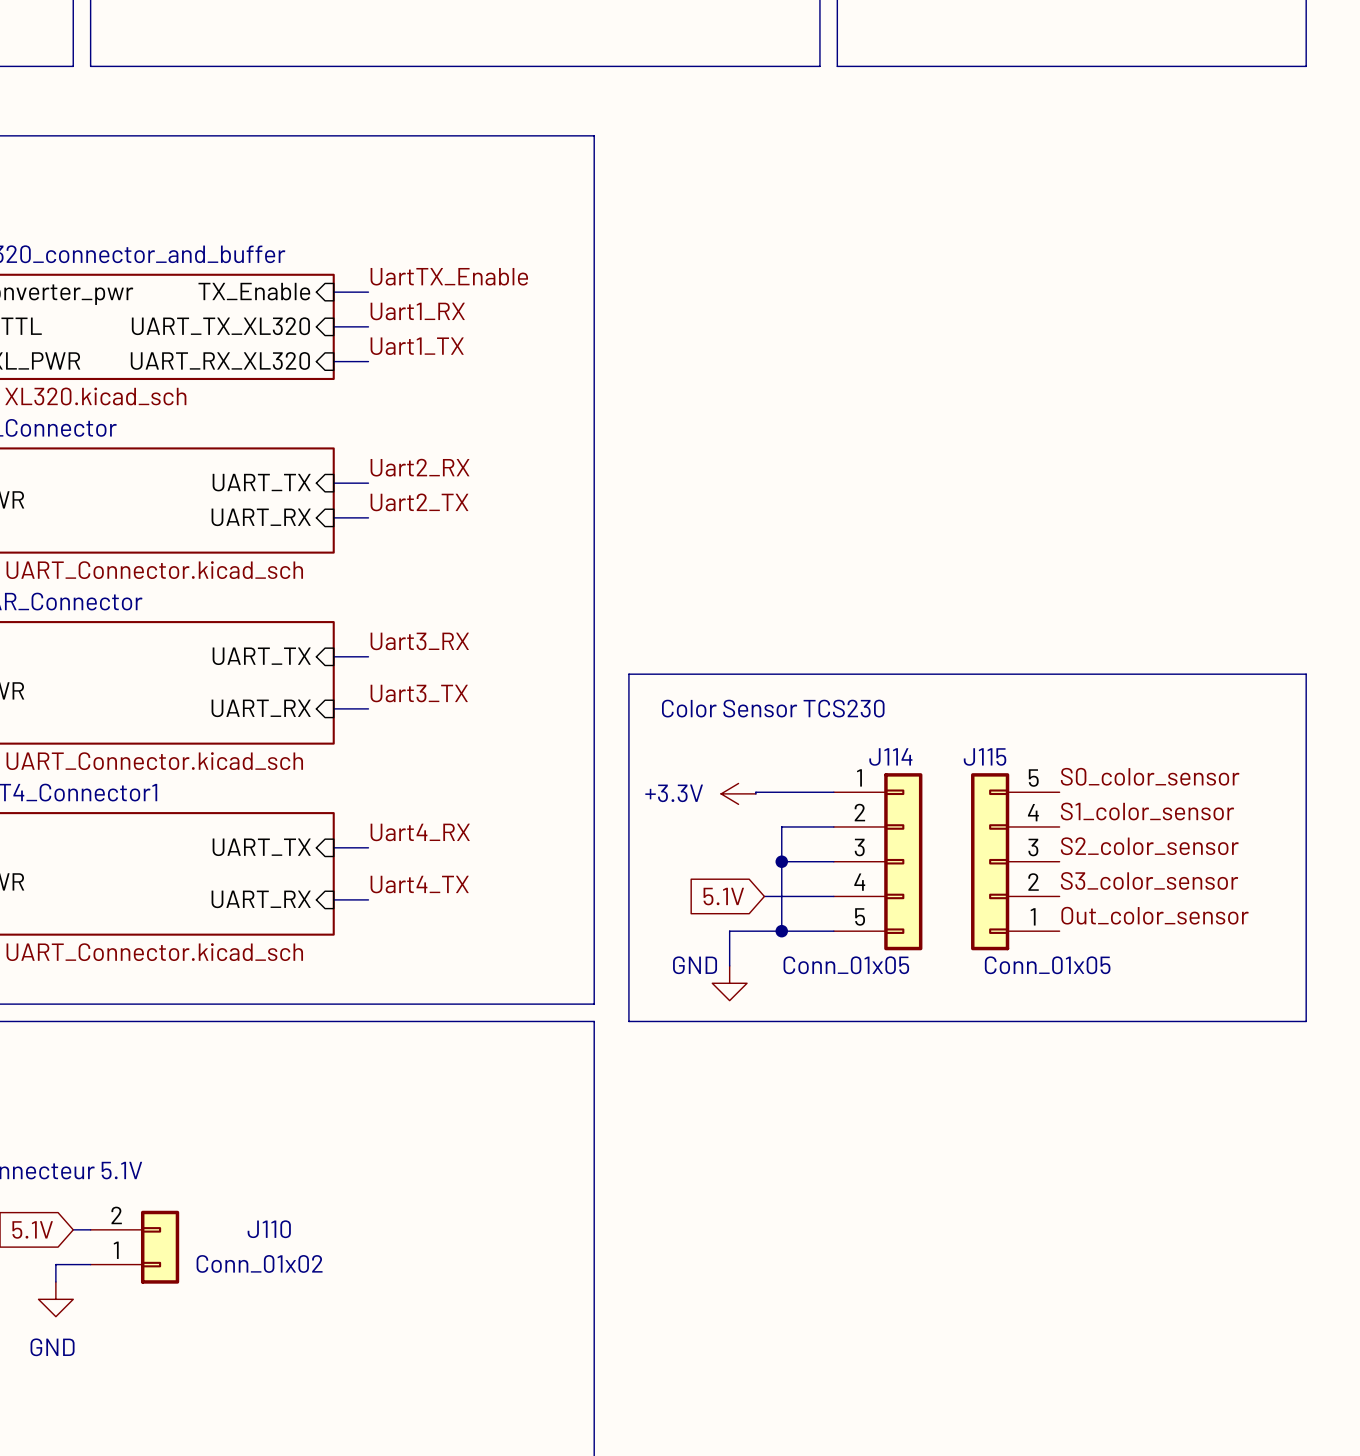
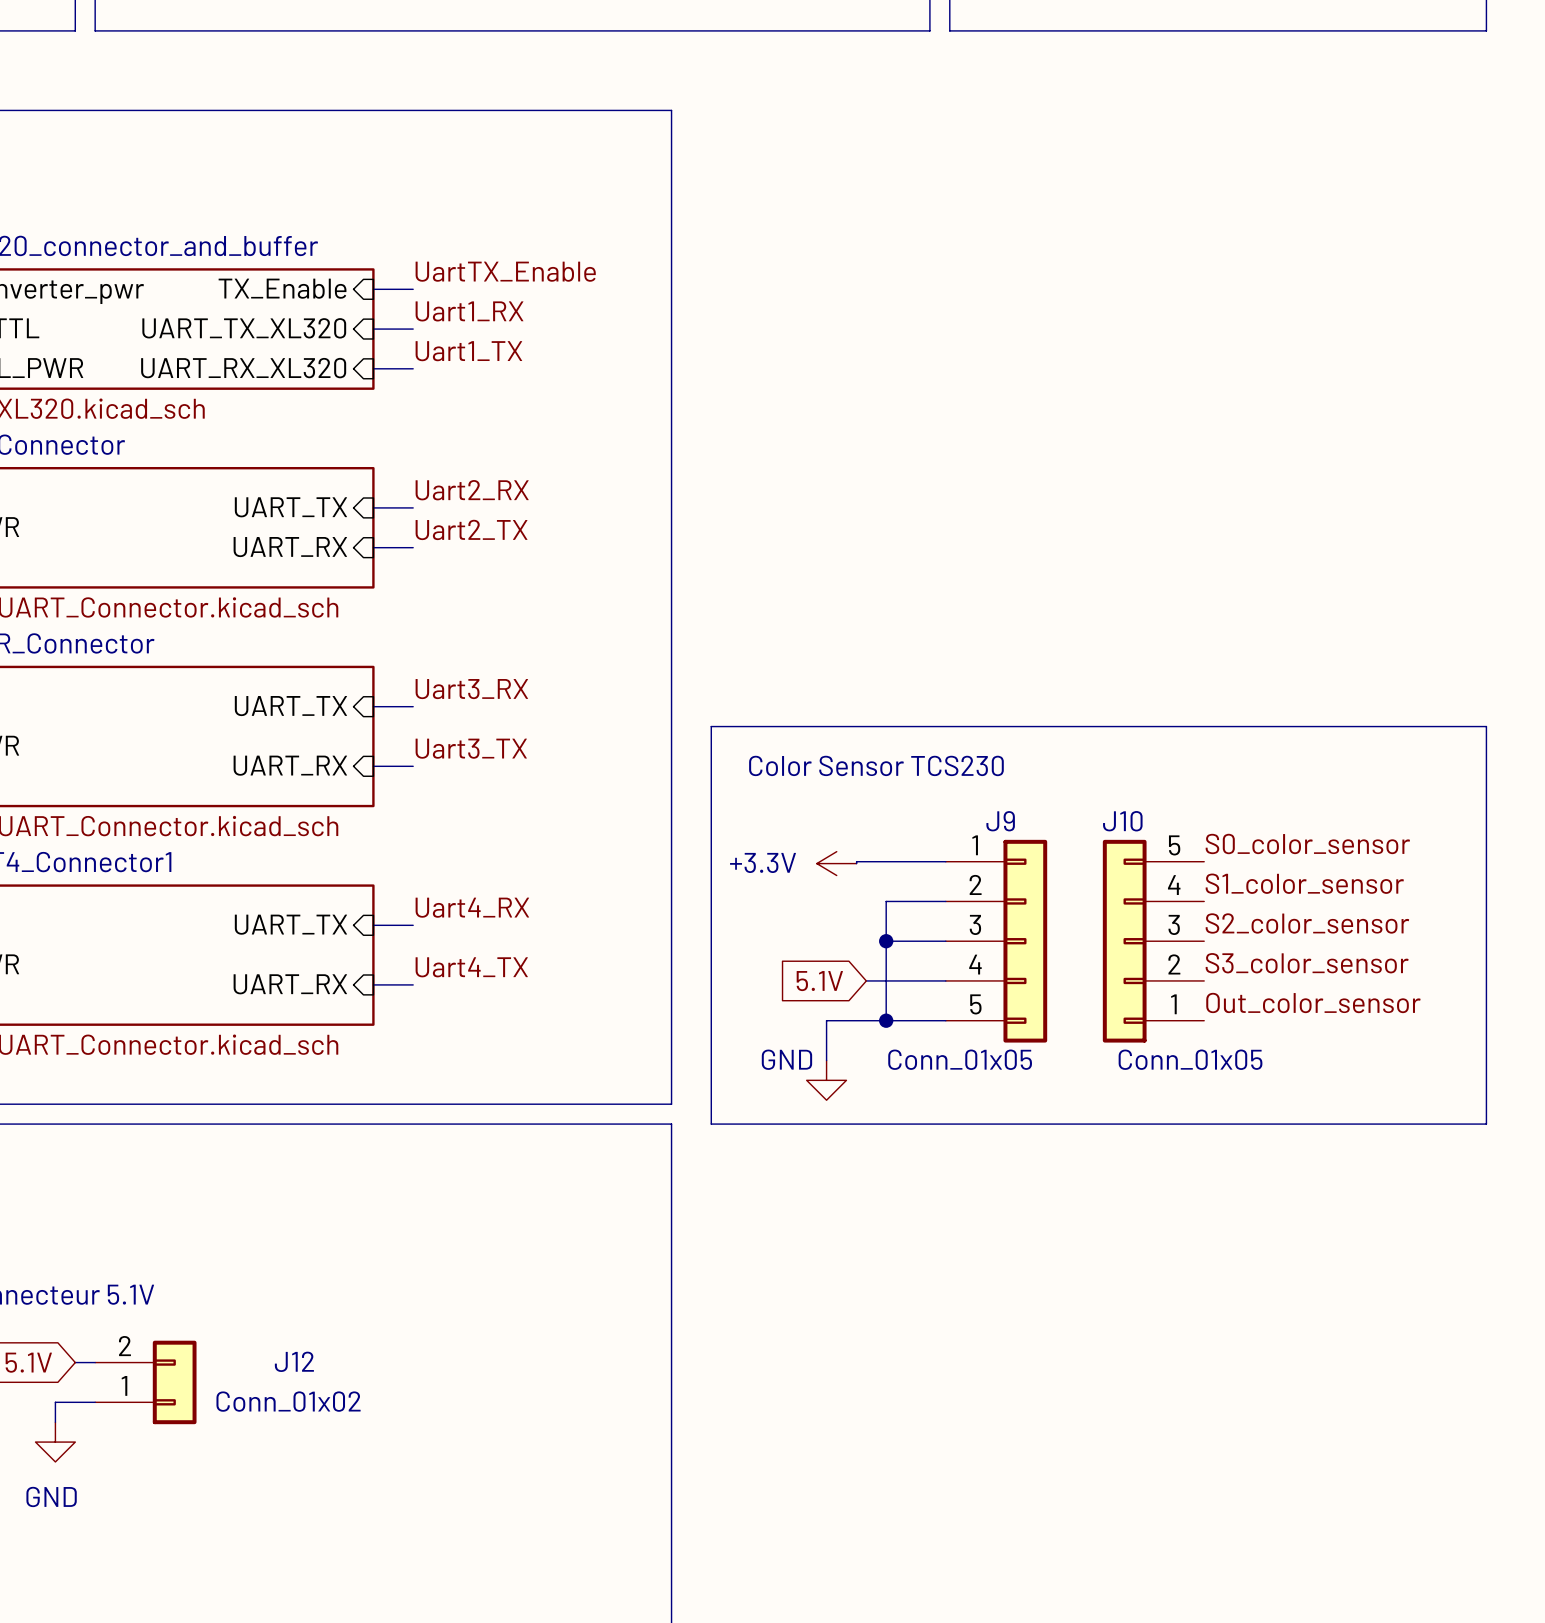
J114 name: J114 (890, 756) -> J9 (1000, 821)
J115 name: J115 (985, 756) -> J10 (1122, 821)
J110 name: J110 (269, 1229) -> J12 (294, 1361)

